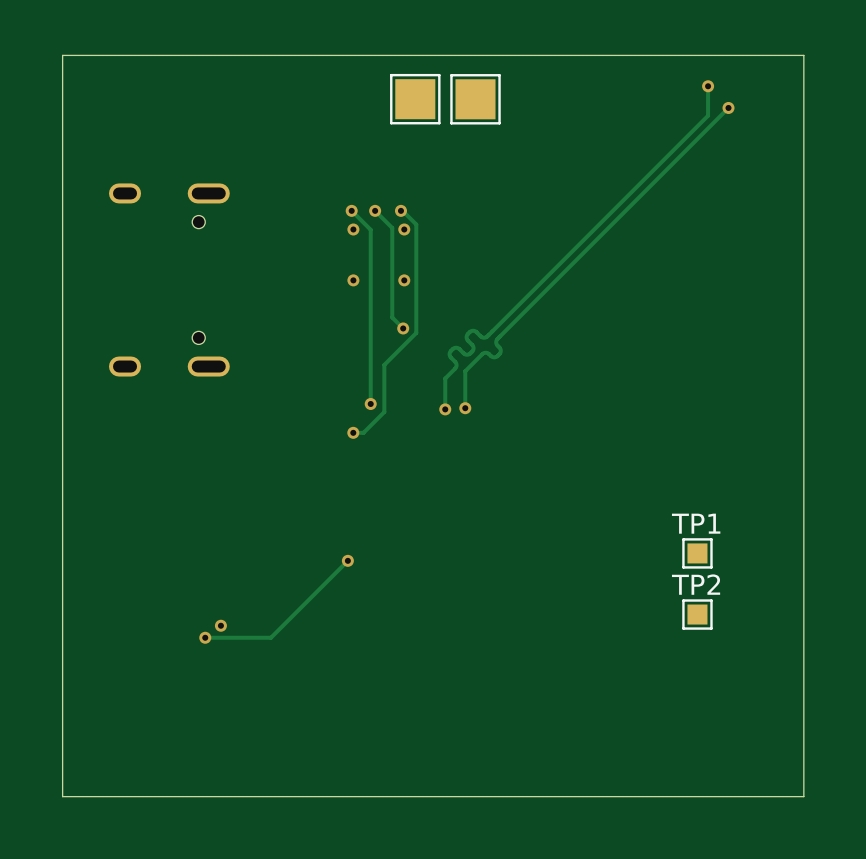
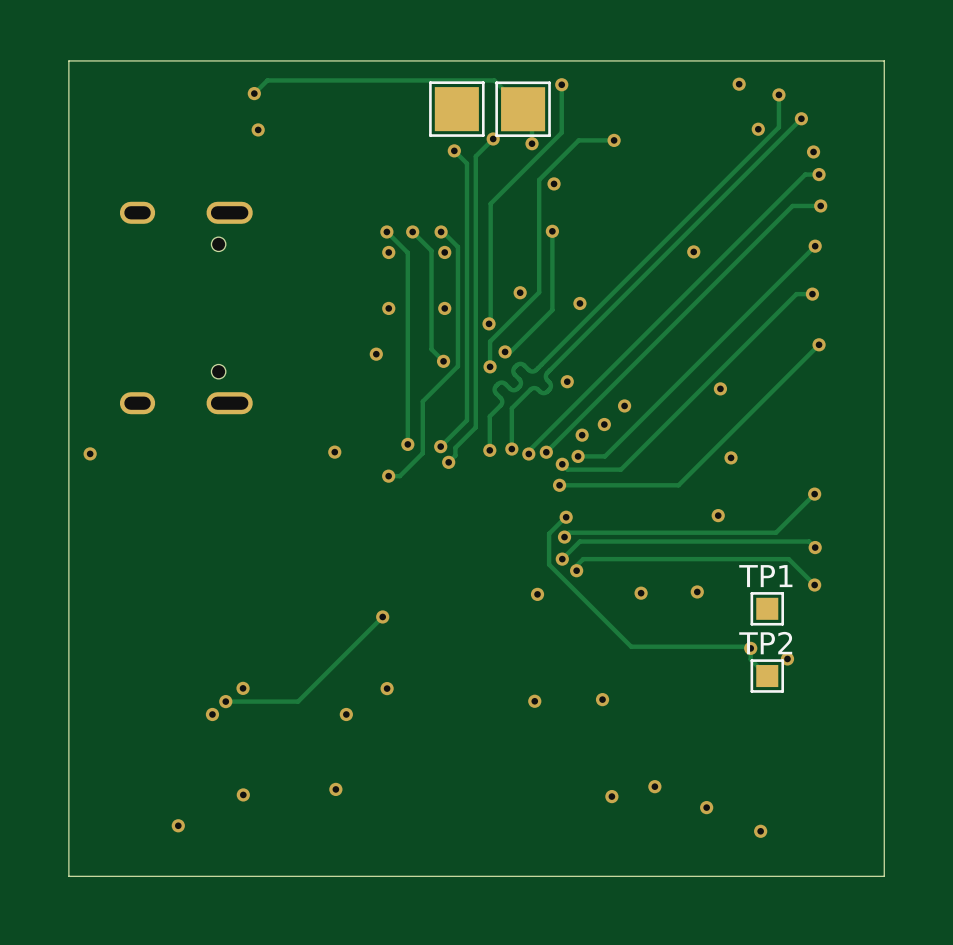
via: none -> (739, 84)
track: none -> (561, 84) (561, 132) (490, 203) (490, 322) (489, 323)
via: none -> (561, 84)
track: none -> (254, 93) (267, 80) (494, 80) (532, 118) (532, 143)
via: none -> (254, 93)
via: none -> (758, 129)
via: none -> (258, 129)
track: none -> (493, 138) (475, 156) (475, 427) (455, 447) (455, 455) (448, 462)
via: none -> (493, 138)
track: none -> (614, 140) (578, 140) (539, 179) (539, 292) (490, 341) (490, 366)
via: none -> (614, 140)
via: none -> (532, 143)
track: none -> (454, 150) (467, 163) (467, 420) (440, 446)
via: none -> (454, 150)
via: none -> (813, 151)
track: none -> (819, 174) (805, 174) (528, 451) (528, 453)
via: none -> (819, 174)
via: none -> (554, 183)
track: none -> (820, 205) (792, 205) (546, 452)
via: none -> (820, 205)
track: none -> (552, 231) (552, 310) (508, 353)
via: none -> (552, 231)
track: none -> (815, 246) (604, 456) (578, 456)
via: none -> (815, 246)
via: none -> (693, 251)
via: none -> (520, 292)
track: none -> (812, 294) (796, 294) (620, 469) (567, 469) (562, 464)
via: none -> (812, 294)
via: none -> (579, 303)
via: none -> (489, 323)
track: none -> (819, 344) (678, 485) (559, 485)
via: none -> (819, 344)
via: none -> (505, 351)
via: none -> (376, 354)
via: none -> (490, 366)
via: none -> (567, 381)
via: none -> (720, 388)
via: none -> (624, 405)
via: none -> (604, 424)
via: none -> (582, 435)
via: none -> (440, 446)
via: none -> (334, 452)
via: none -> (546, 452)
via: none -> (90, 453)
via: none -> (528, 453)
via: none -> (578, 456)
via: none -> (731, 457)
via: none -> (448, 462)
via: none -> (562, 464)
via: none -> (559, 485)
track: none -> (814, 494) (776, 532) (568, 532) (564, 537)
via: none -> (814, 494)
via: none -> (718, 515)
track: none -> (565, 517) (549, 533) (549, 564) (631, 646) (750, 646) (750, 659) (767, 676)
via: none -> (566, 517)
via: none -> (564, 537)
track: none -> (815, 547) (809, 541) (579, 541) (562, 559)
via: none -> (815, 547)
via: none -> (562, 559)
track: none -> (576, 570) (576, 565) (583, 559) (788, 559) (814, 585)
via: none -> (576, 570)
via: none -> (814, 585)
via: none -> (697, 591)
via: none -> (641, 593)
via: none -> (537, 594)
via: none -> (750, 648)
via: none -> (787, 658)
via: none -> (387, 688)
via: none -> (602, 699)
via: none -> (534, 701)
via: none -> (212, 714)
via: none -> (346, 714)
via: none -> (654, 786)
via: none -> (335, 789)
via: none -> (243, 794)
via: none -> (611, 796)
via: none -> (706, 807)
via: none -> (178, 825)
via: none -> (760, 831)

